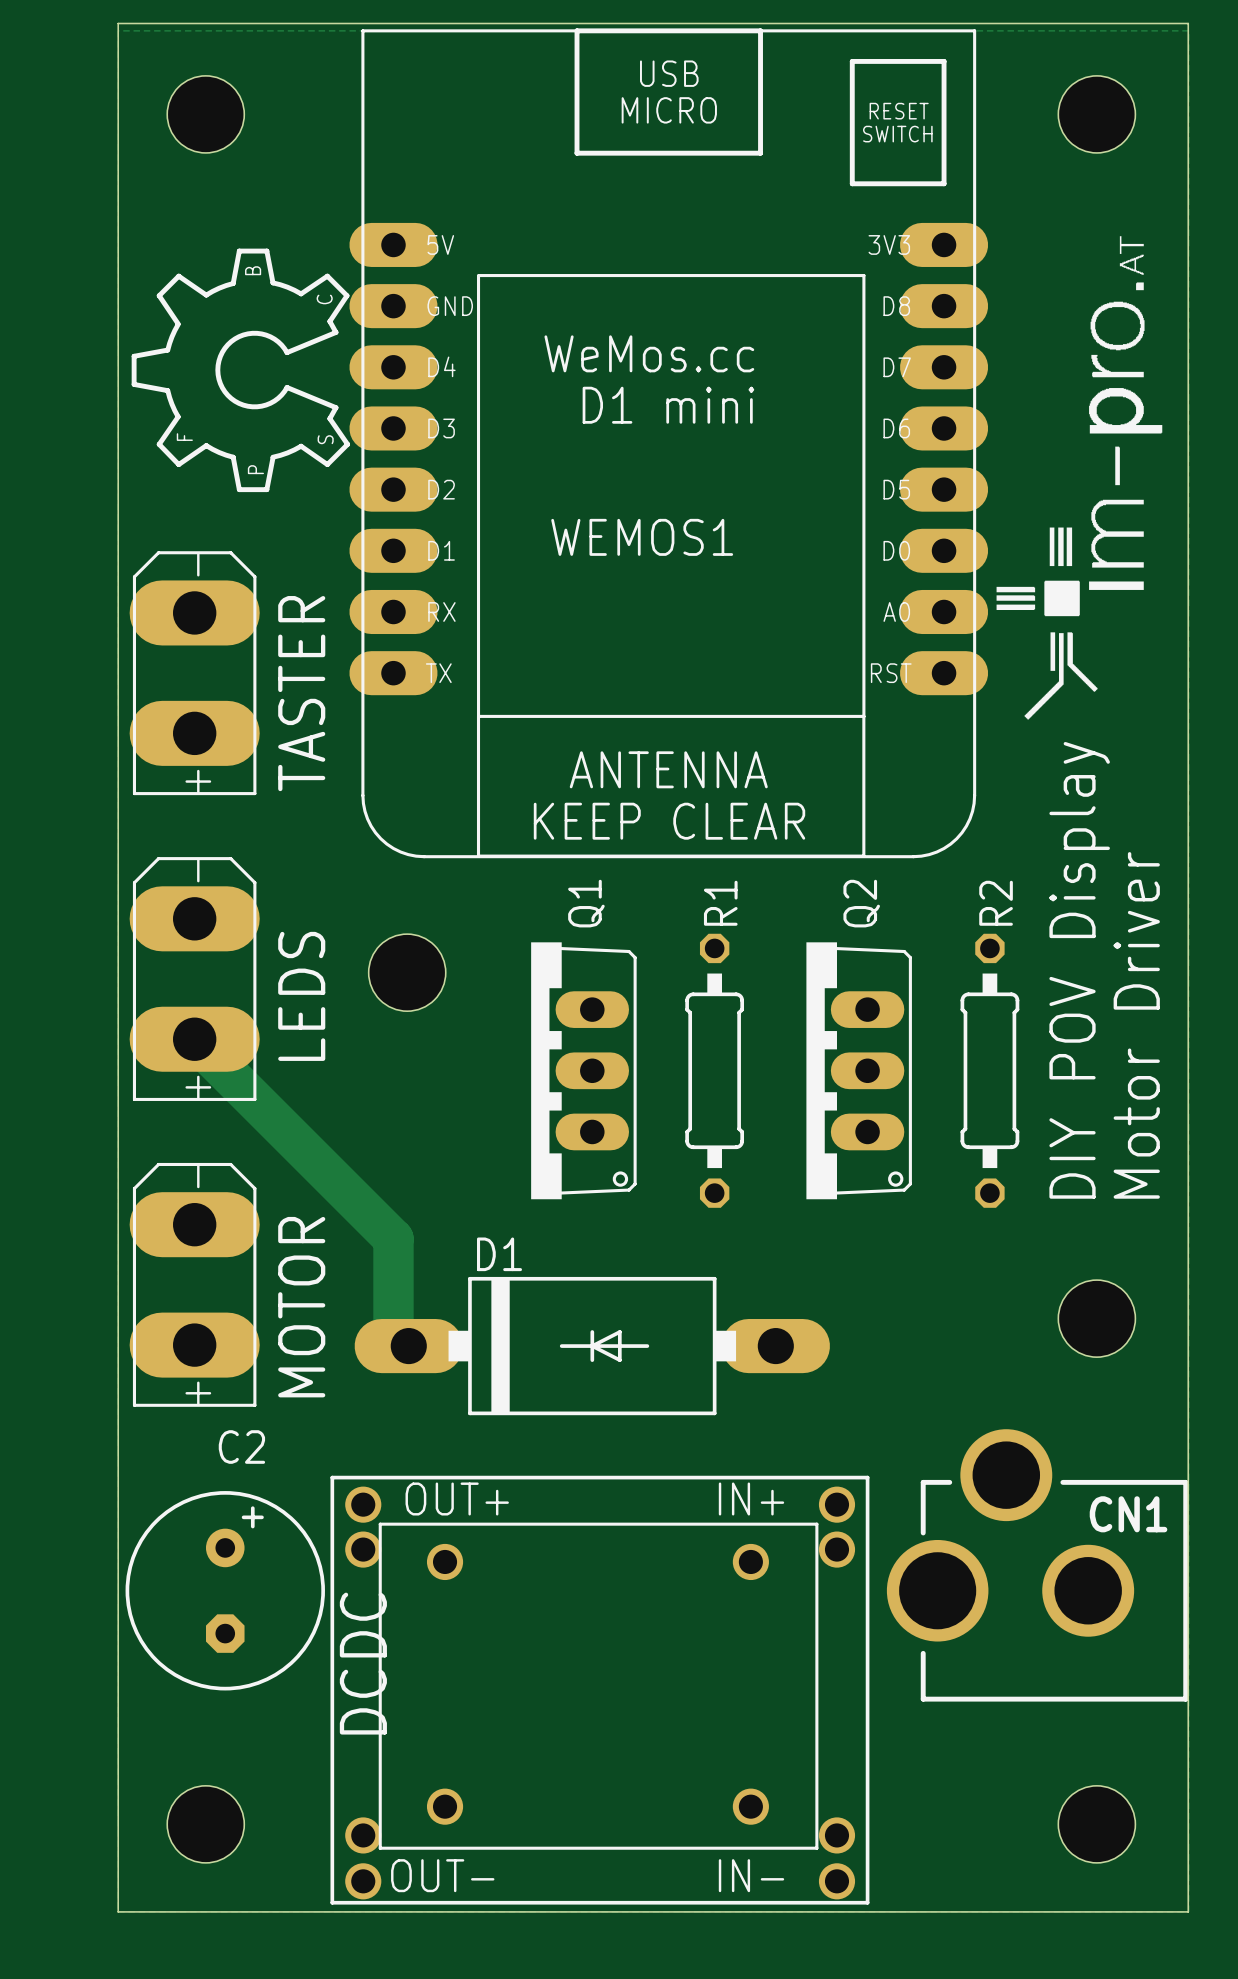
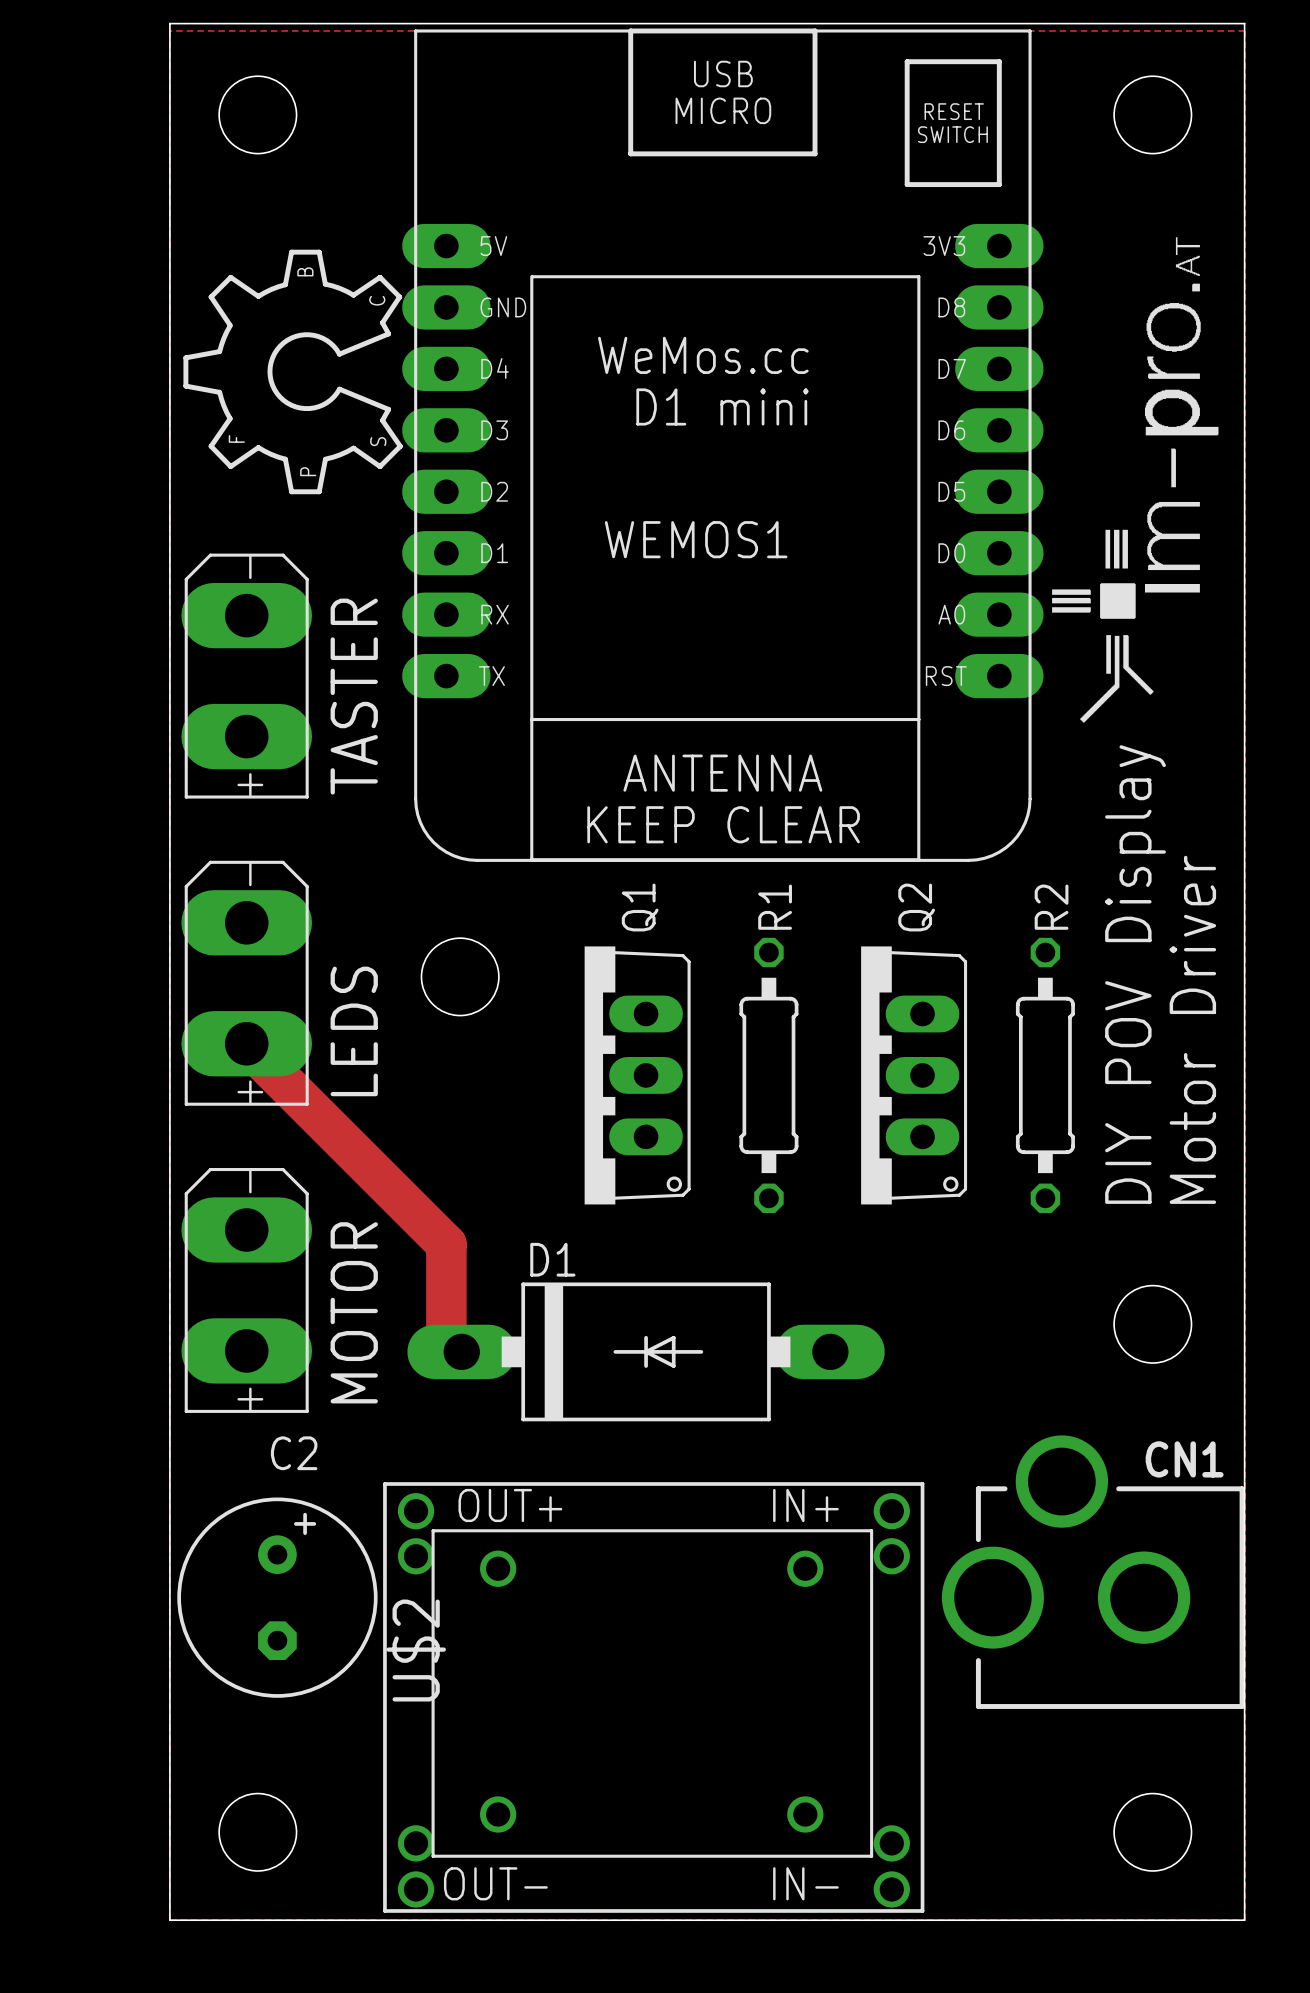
LEDS name position: LEDS (301, 996) -> LEDS (354, 1031)
CN1 name position: CN1 (1128, 1514) -> CN1 (1184, 1459)
DCDC name: DCDC (363, 1663) -> U$2 (416, 1650)

